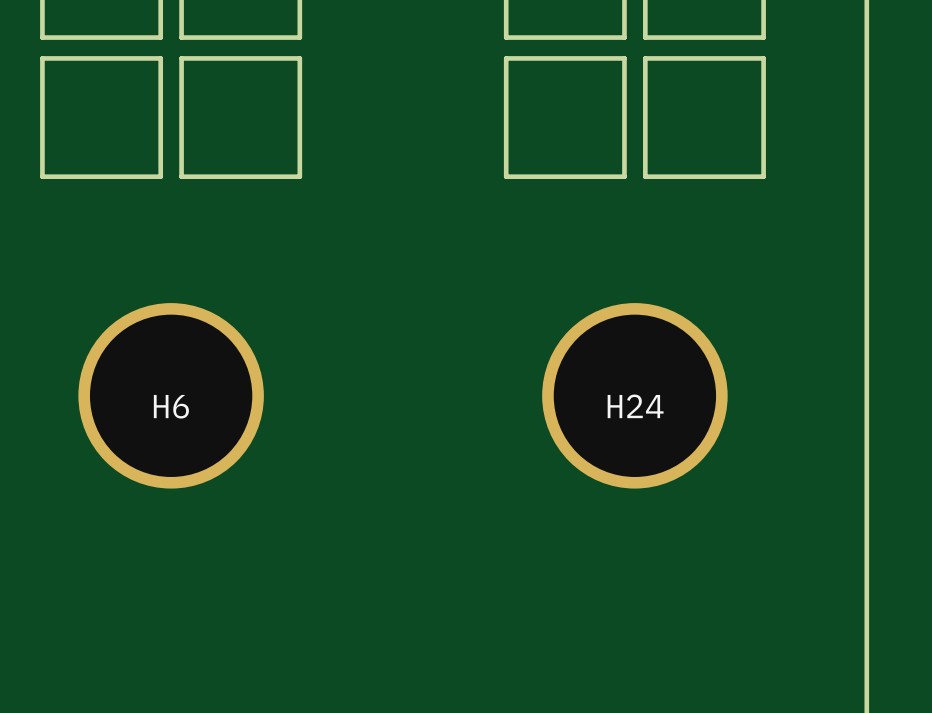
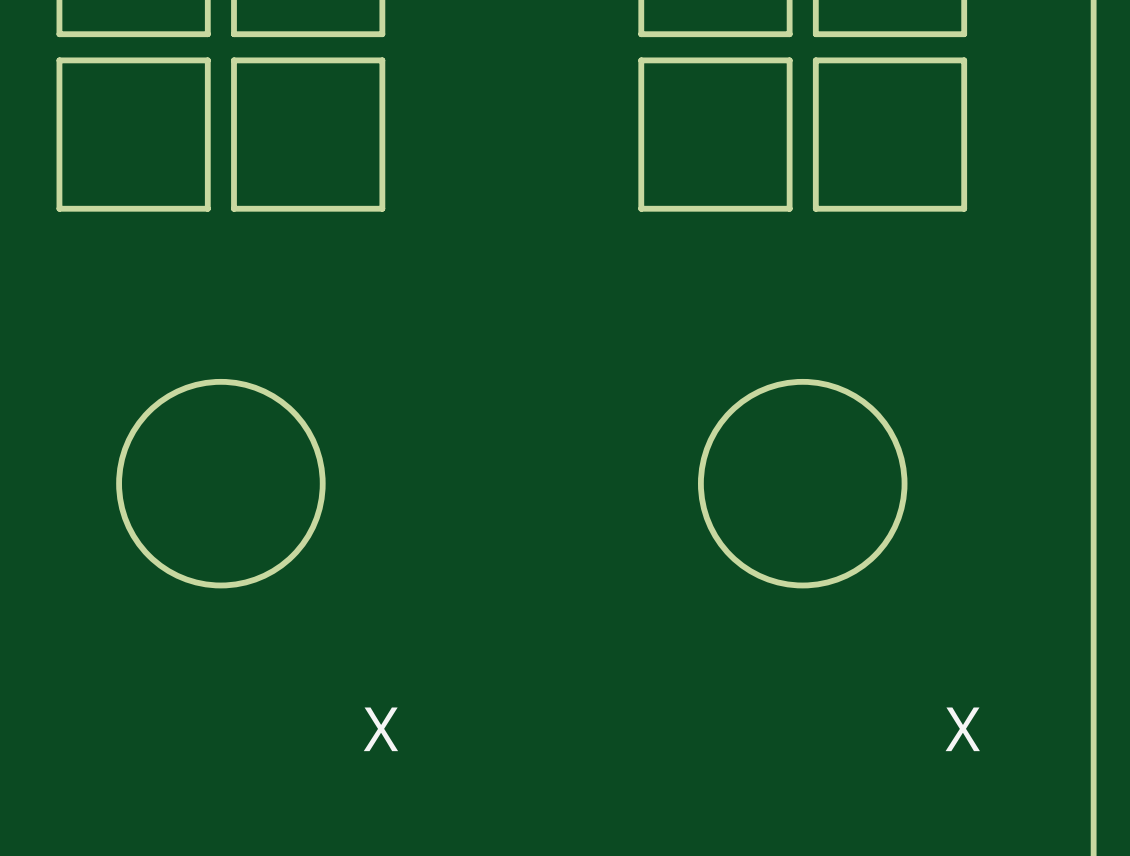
round board edge: none -> [116, 378, 326, 589]
round board edge: none -> [698, 378, 908, 589]
H6: (171, 395) -> none
H24: (634, 395) -> none
text: none -> X (380, 729)
text: none -> X (962, 729)

